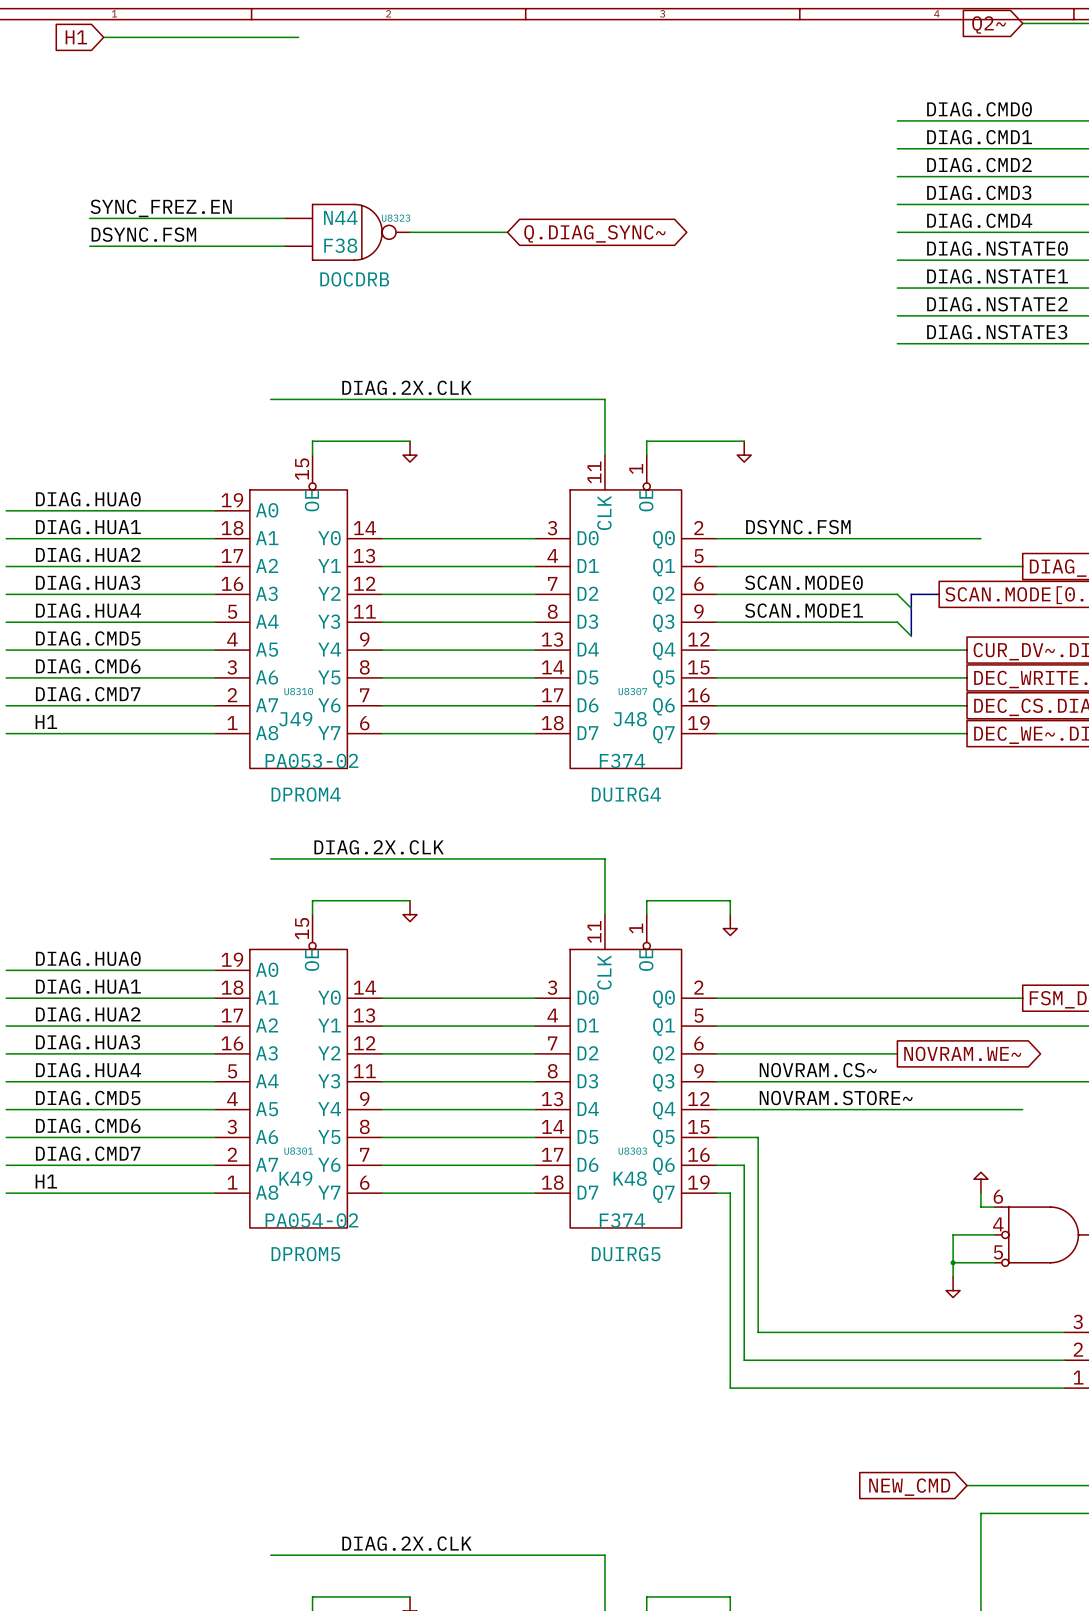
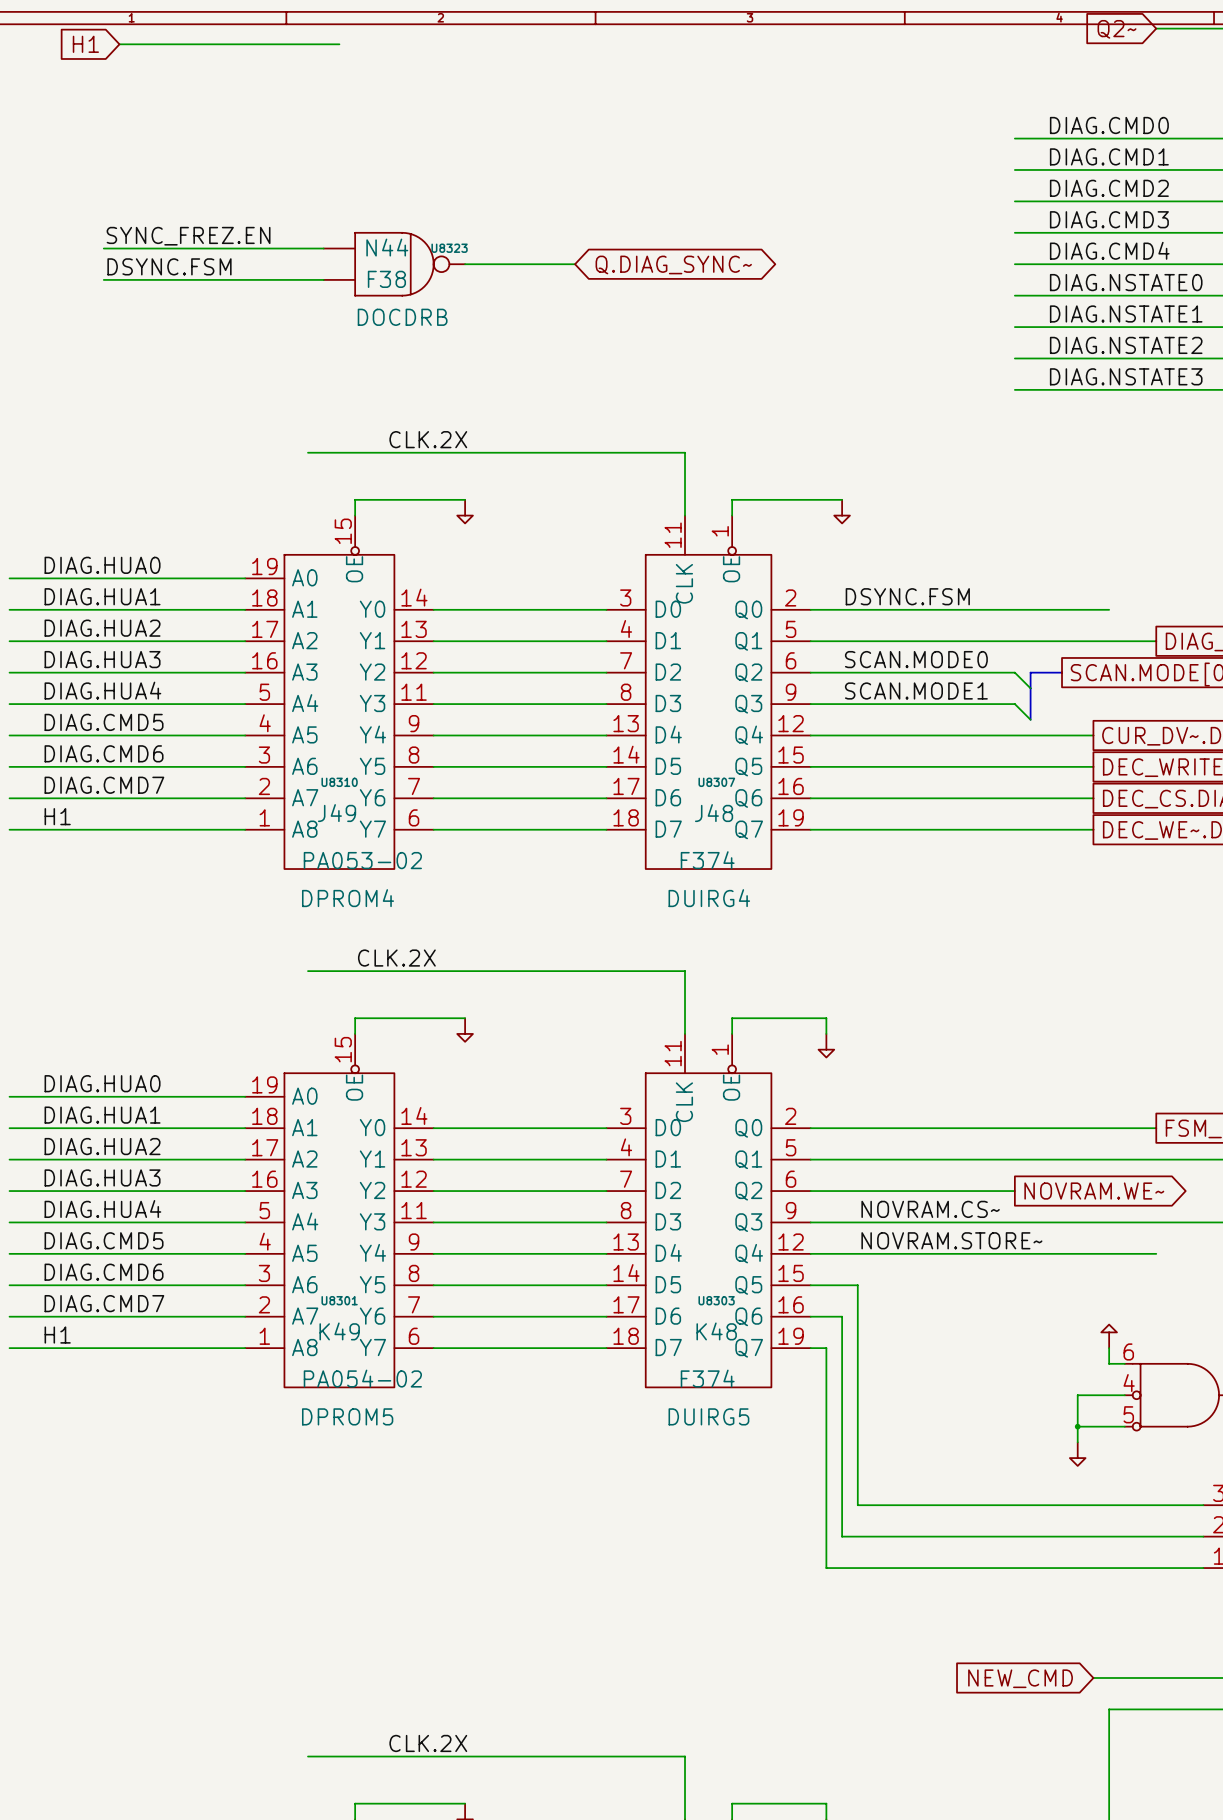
label: DIAG.2X.CLK (406, 387) -> CLK.2X (428, 439)
label: DIAG.2X.CLK (379, 847) -> CLK.2X (396, 958)
label: DIAG.2X.CLK (406, 1543) -> CLK.2X (428, 1743)

